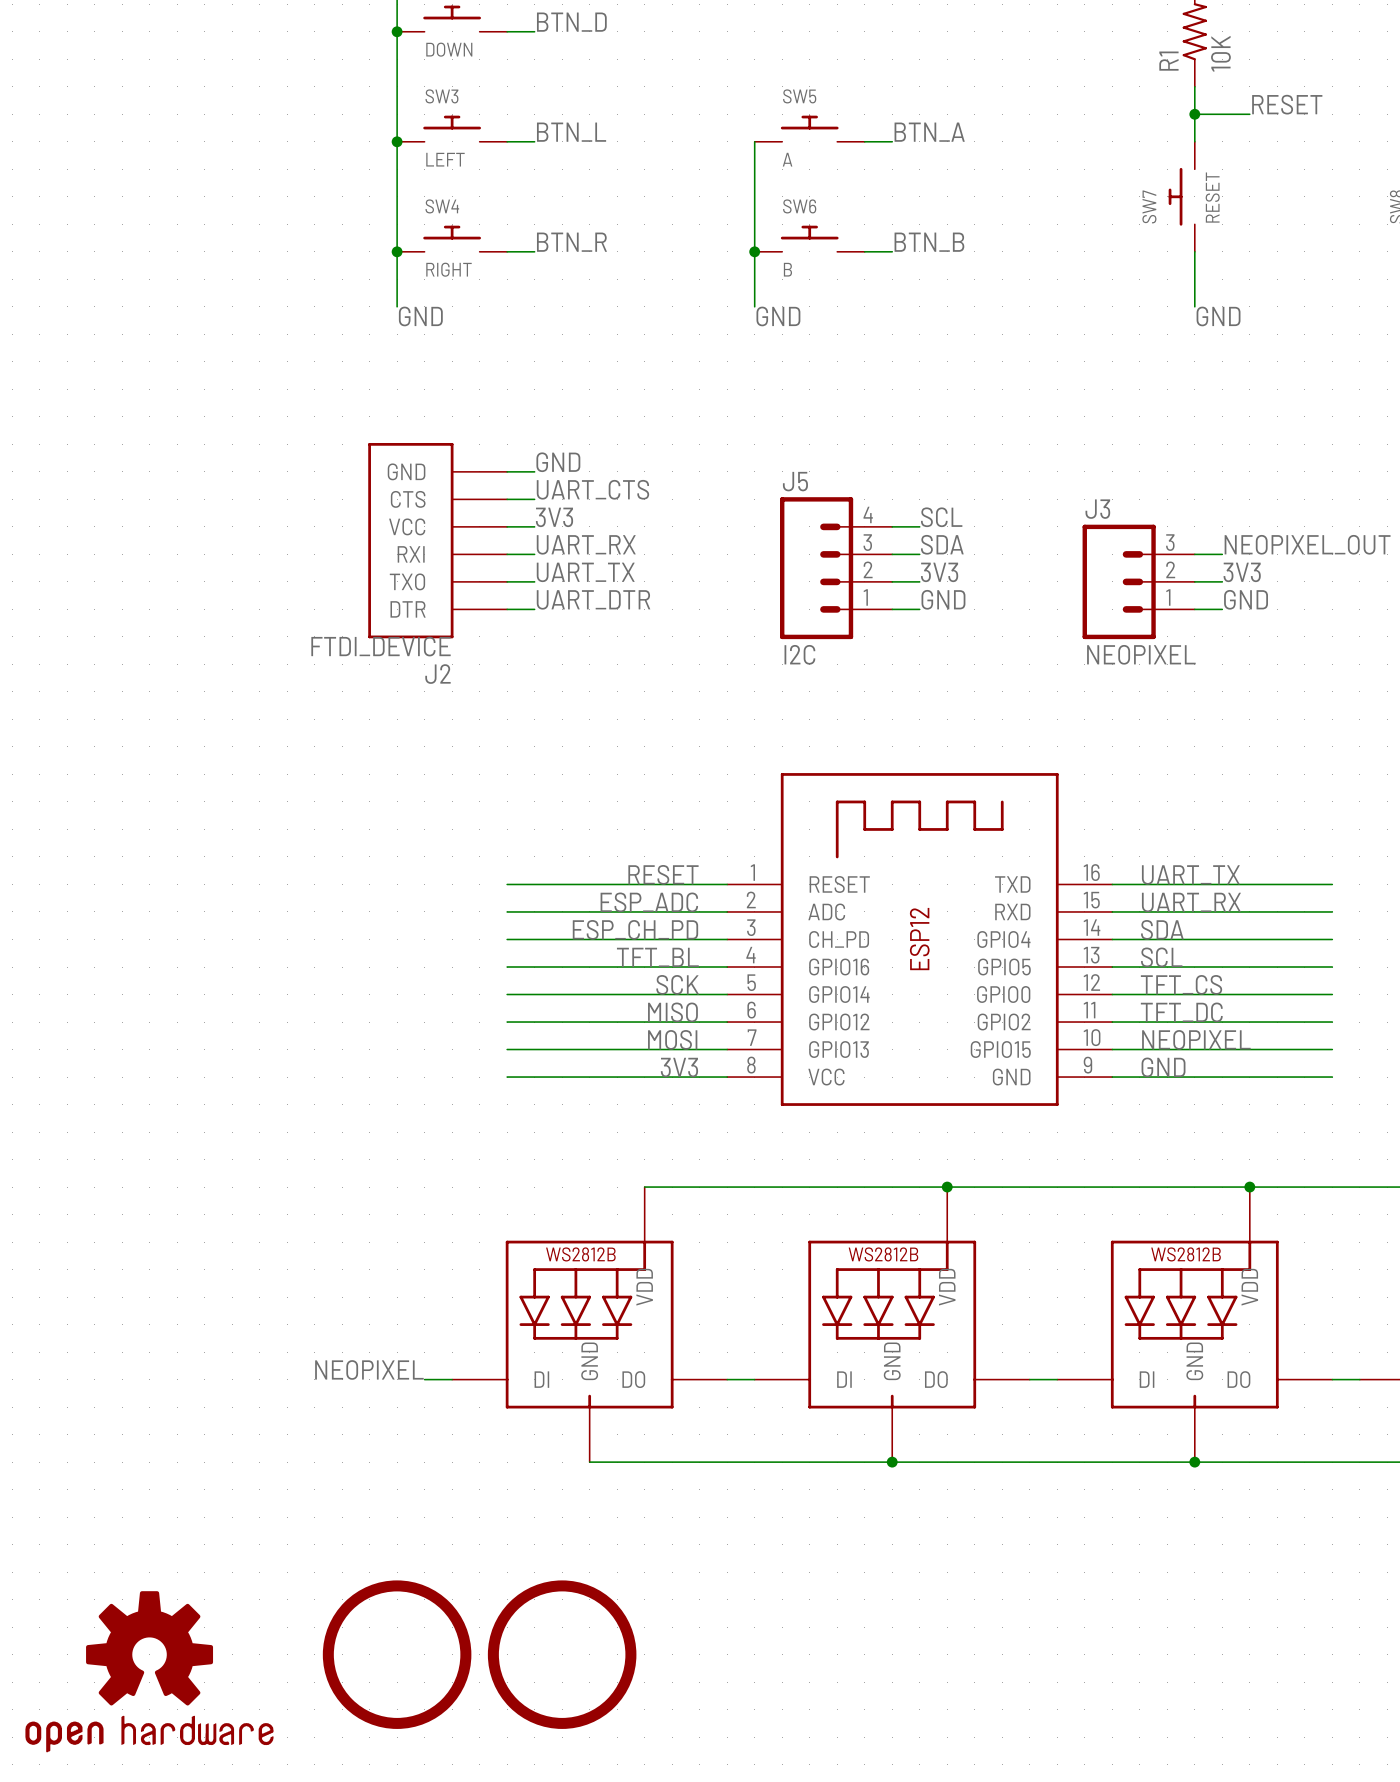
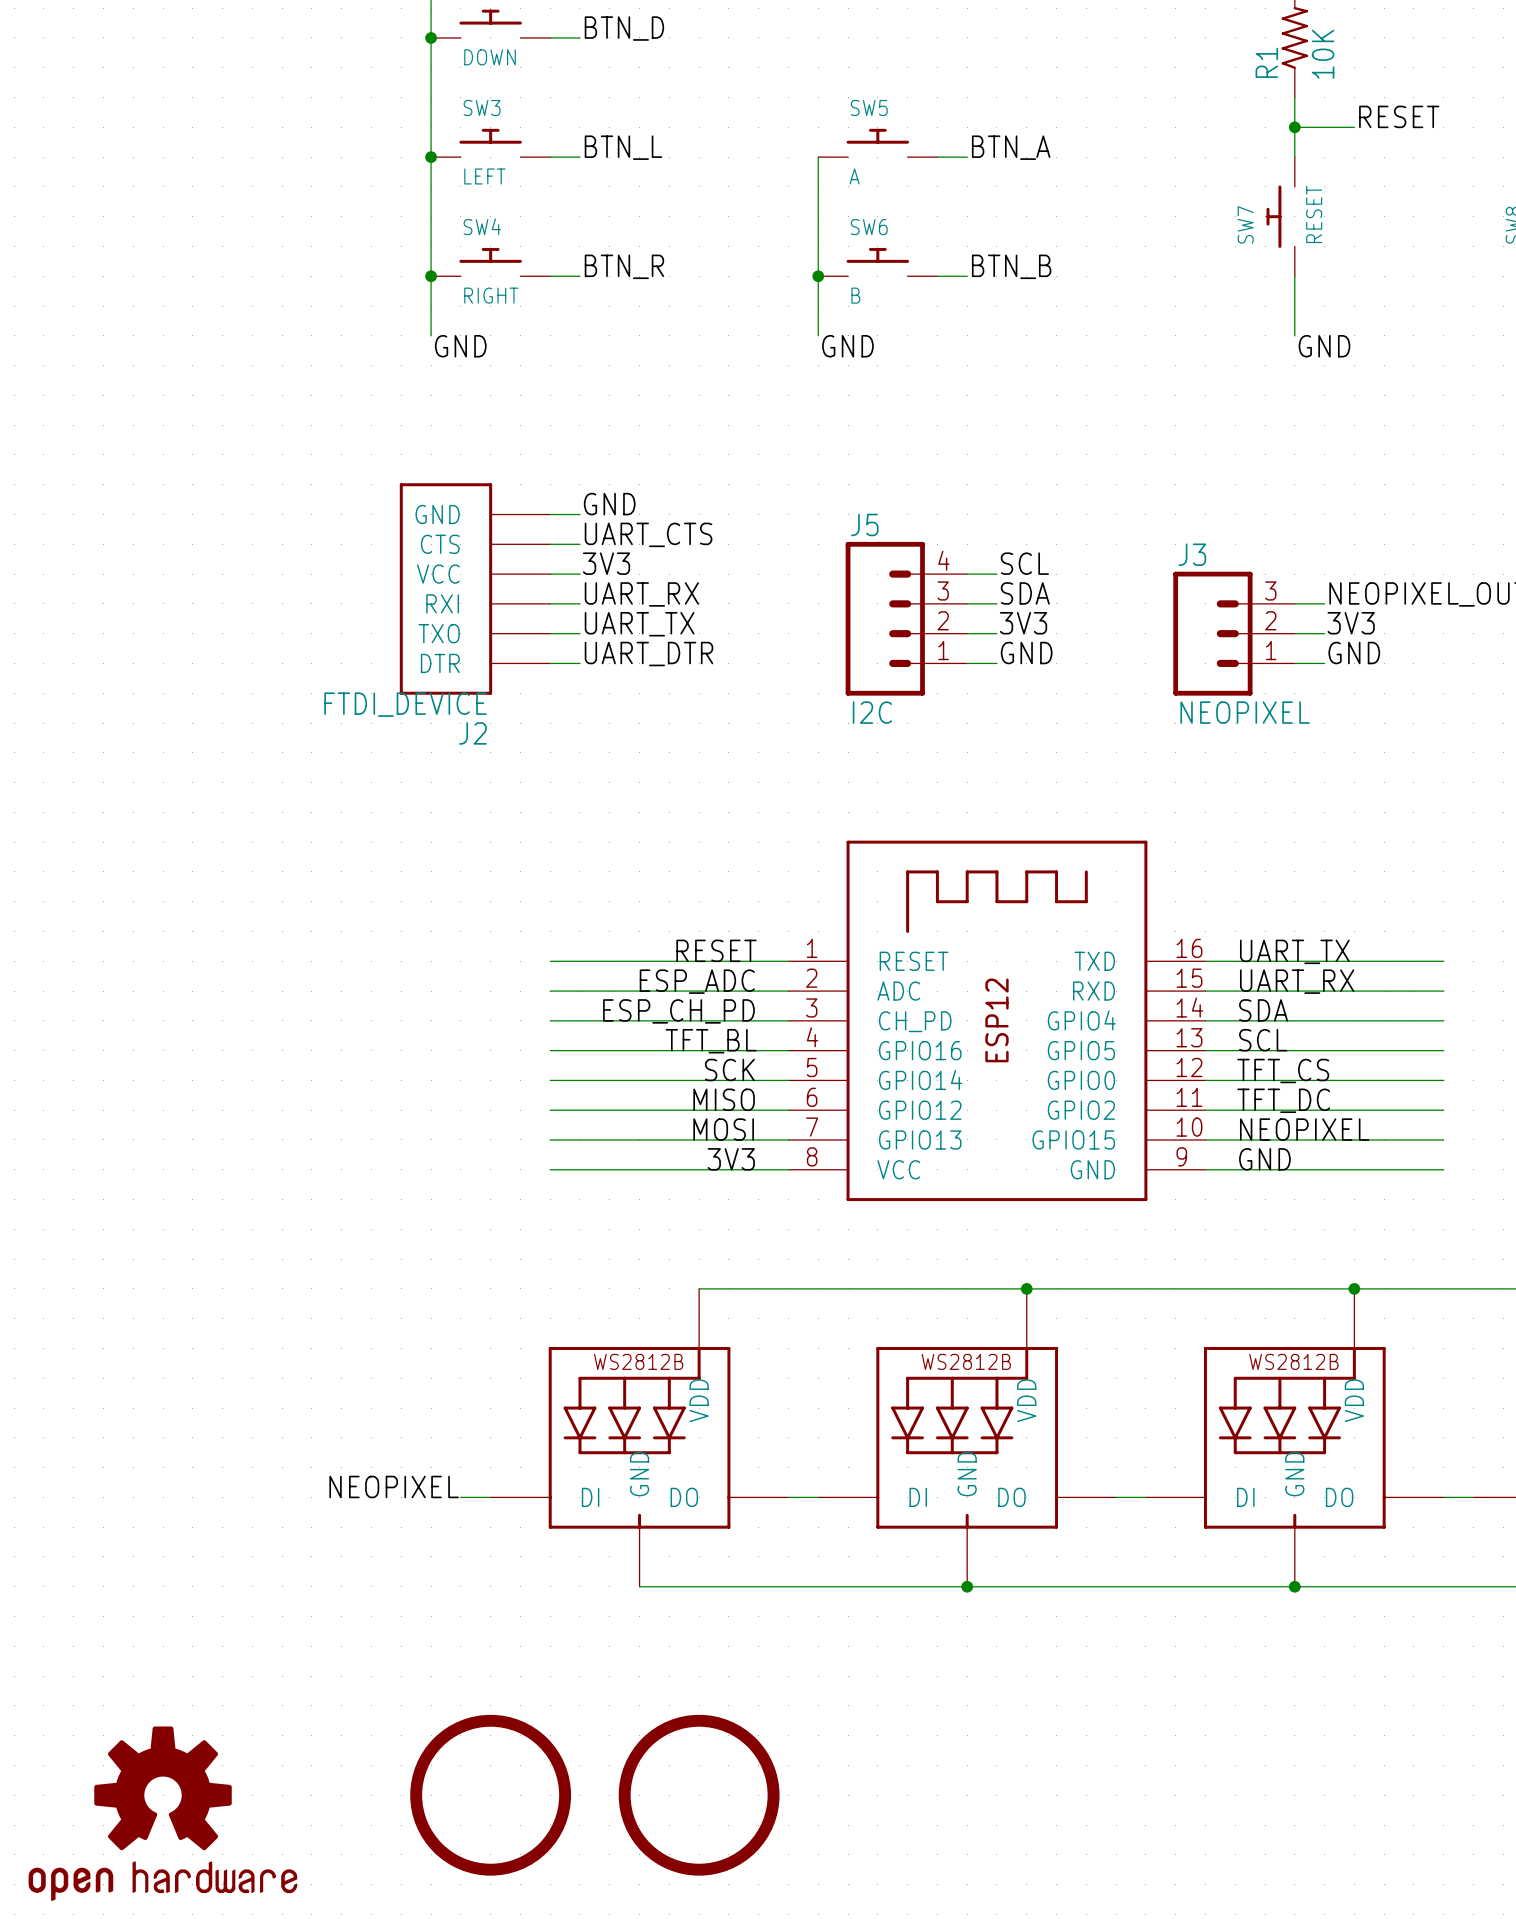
part: (397, 1654) -> none
part: none -> (490, 1795)
part: (562, 1654) -> none
part: none -> (699, 1795)

